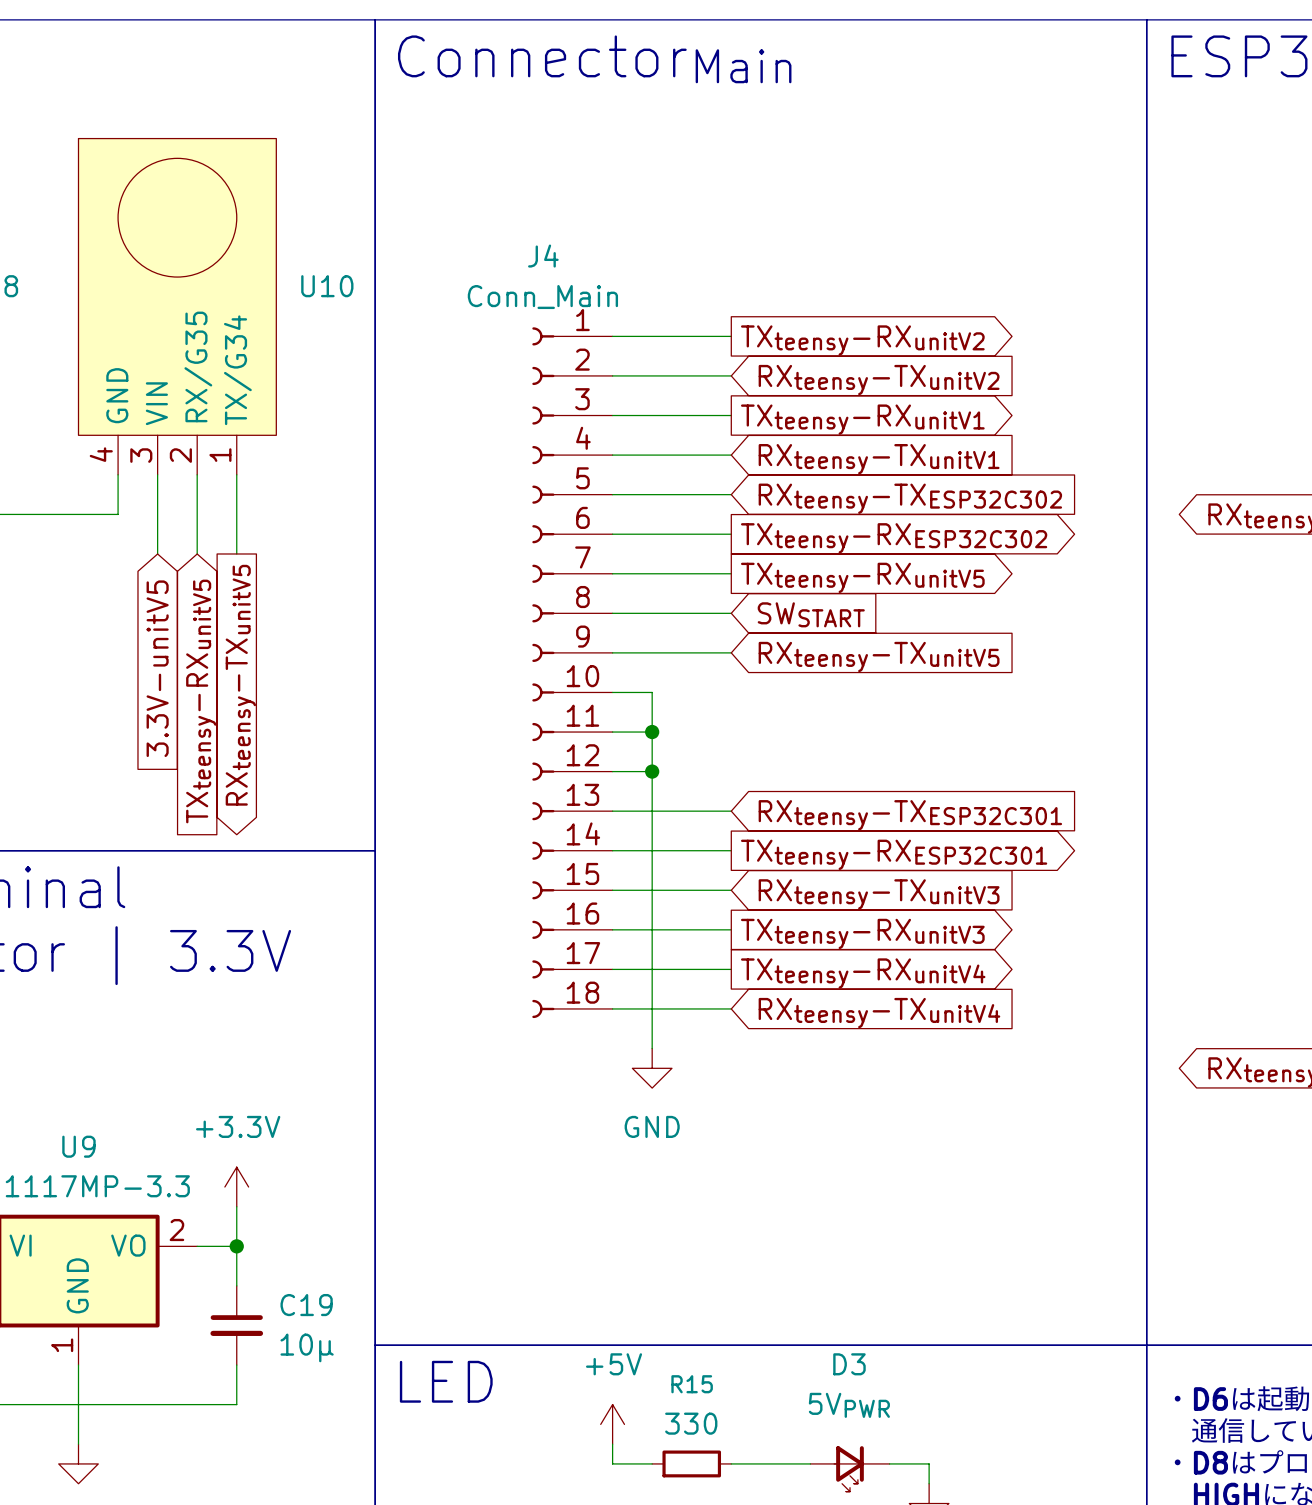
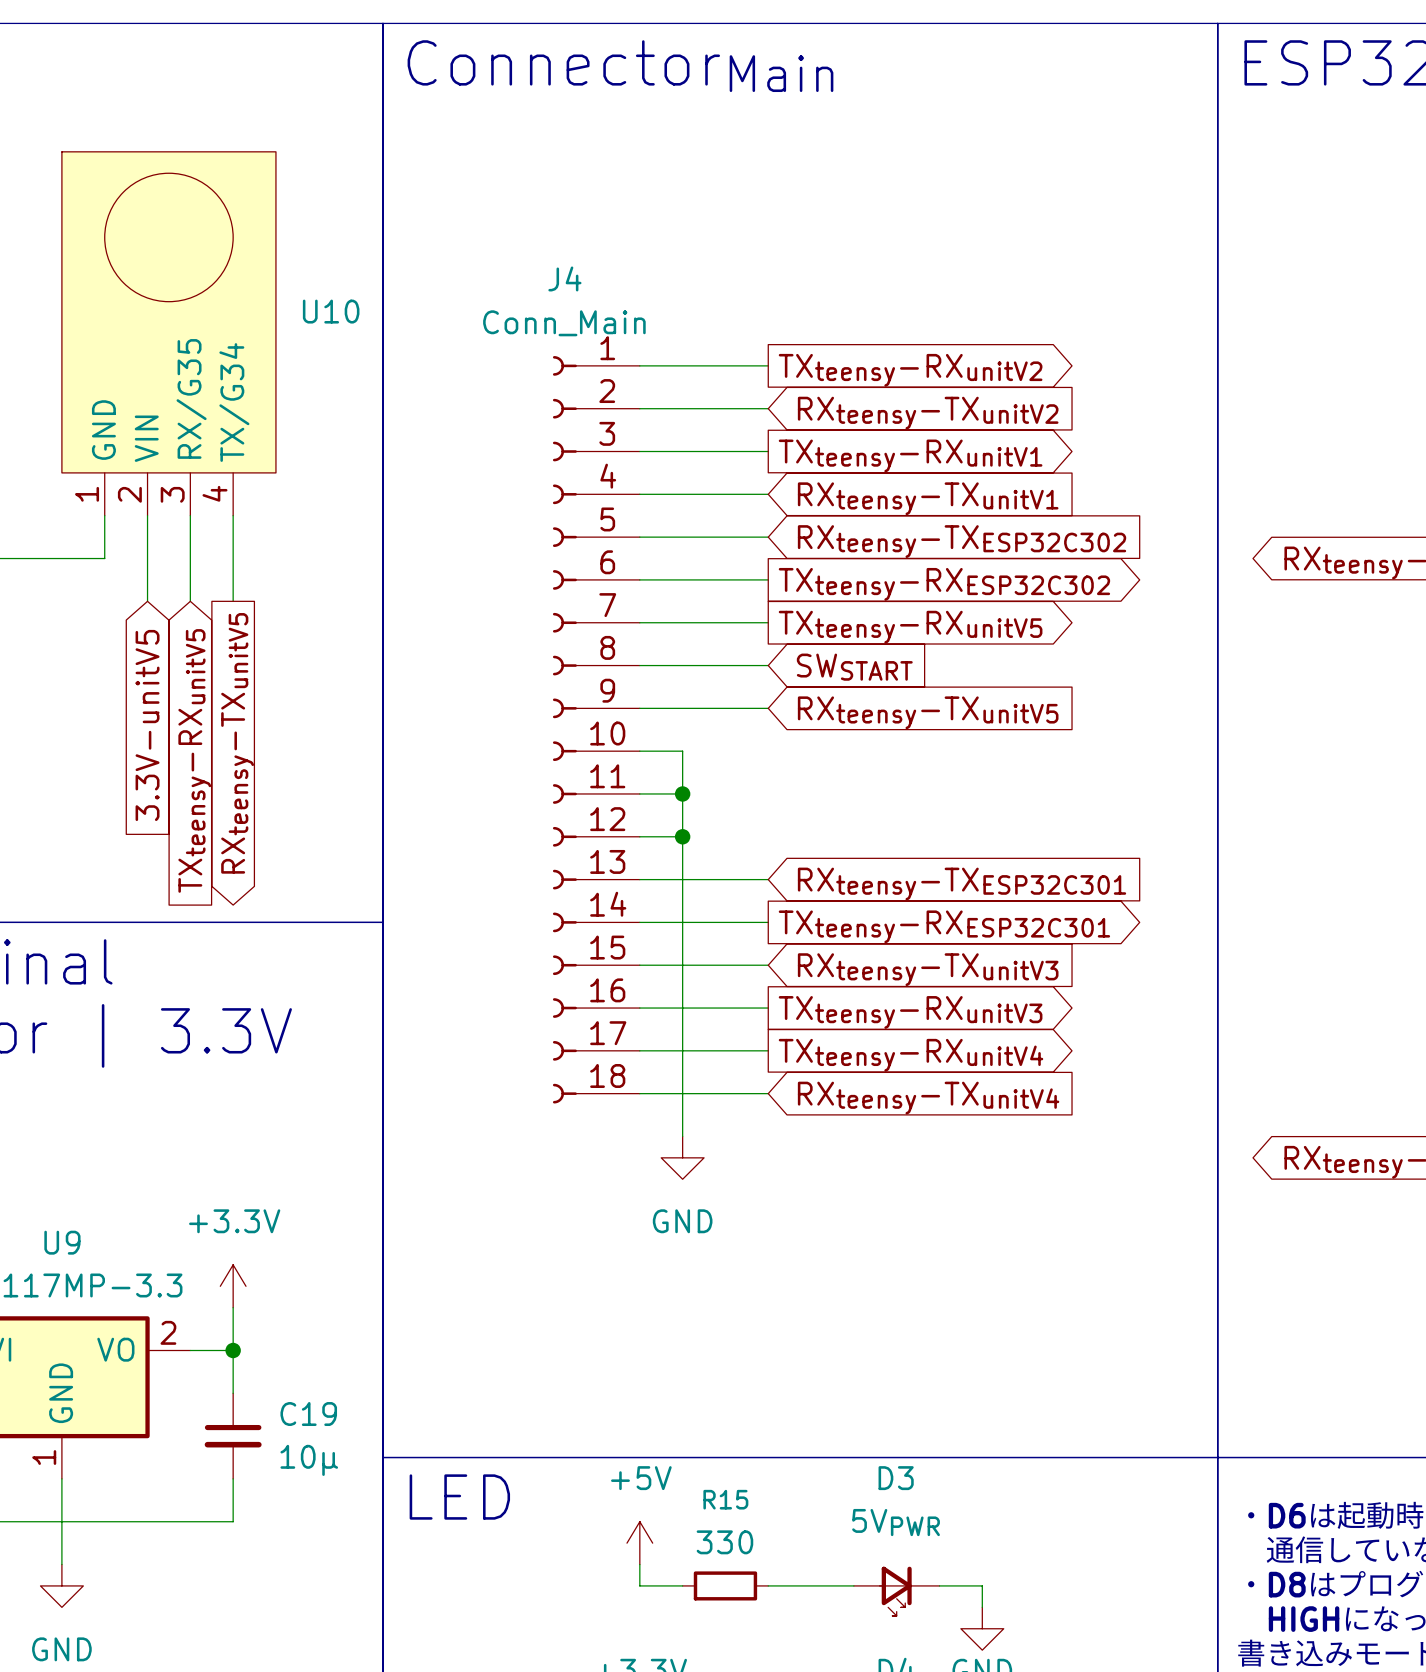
U10 pin number: 4 (101, 454) -> 1 (87, 494)
U10 pin number: 3 (141, 455) -> 2 (129, 494)
U10 pin number: 2 (180, 455) -> 3 (172, 494)
U10 pin number: 1 (220, 455) -> 4 (214, 493)

